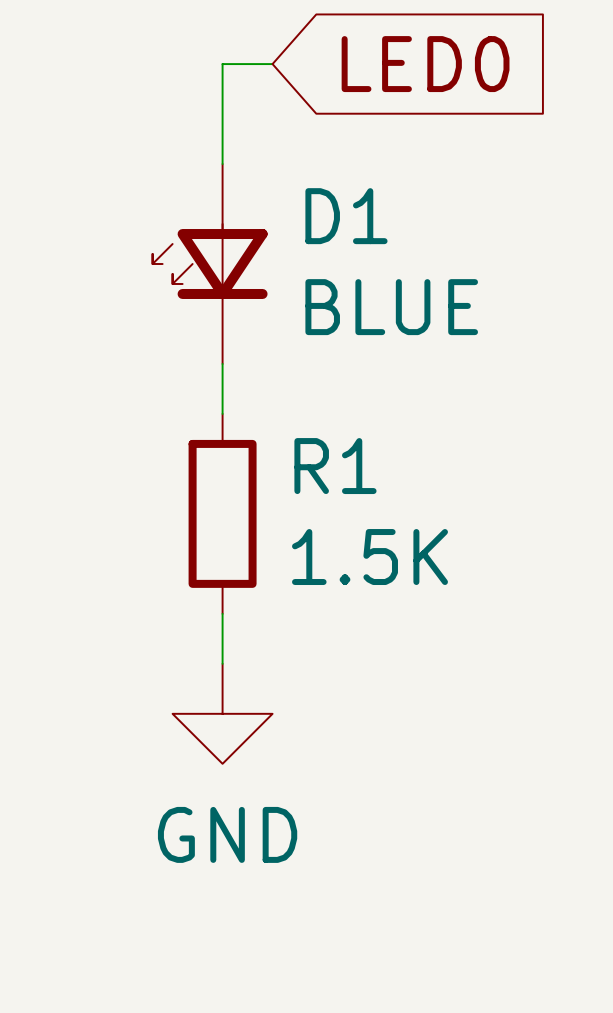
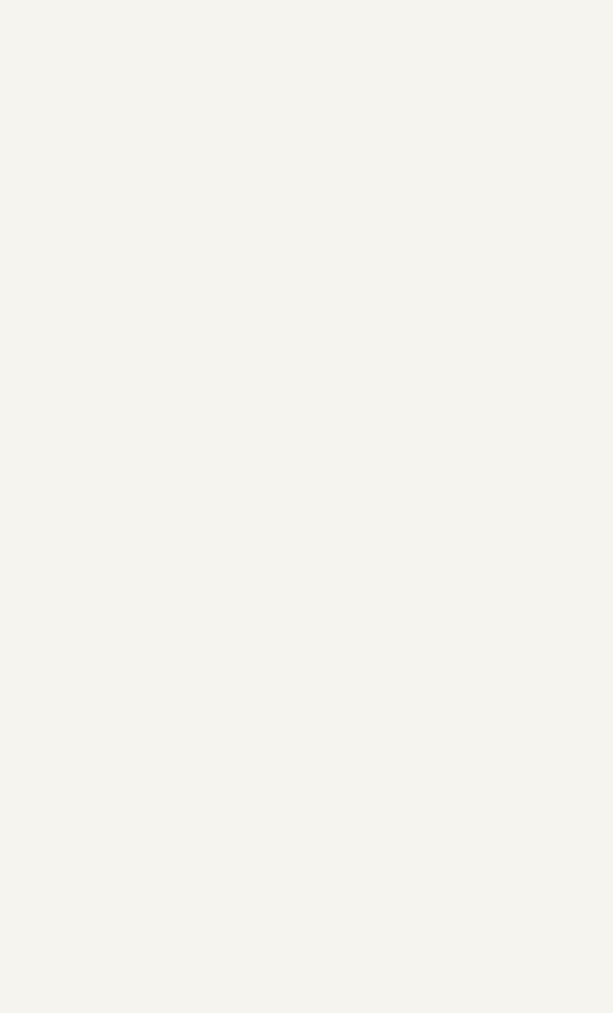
wire: (272, 64) (222, 64) (222, 164) -> none
global label: LED0 (425, 64) -> none
D1: BLUE (210, 264) -> none
wire: (222, 363) (222, 413) -> none
R1: 1.5K (222, 513) -> none
wire: (222, 613) (222, 663) -> none
power symbol: GND (222, 713) -> none

